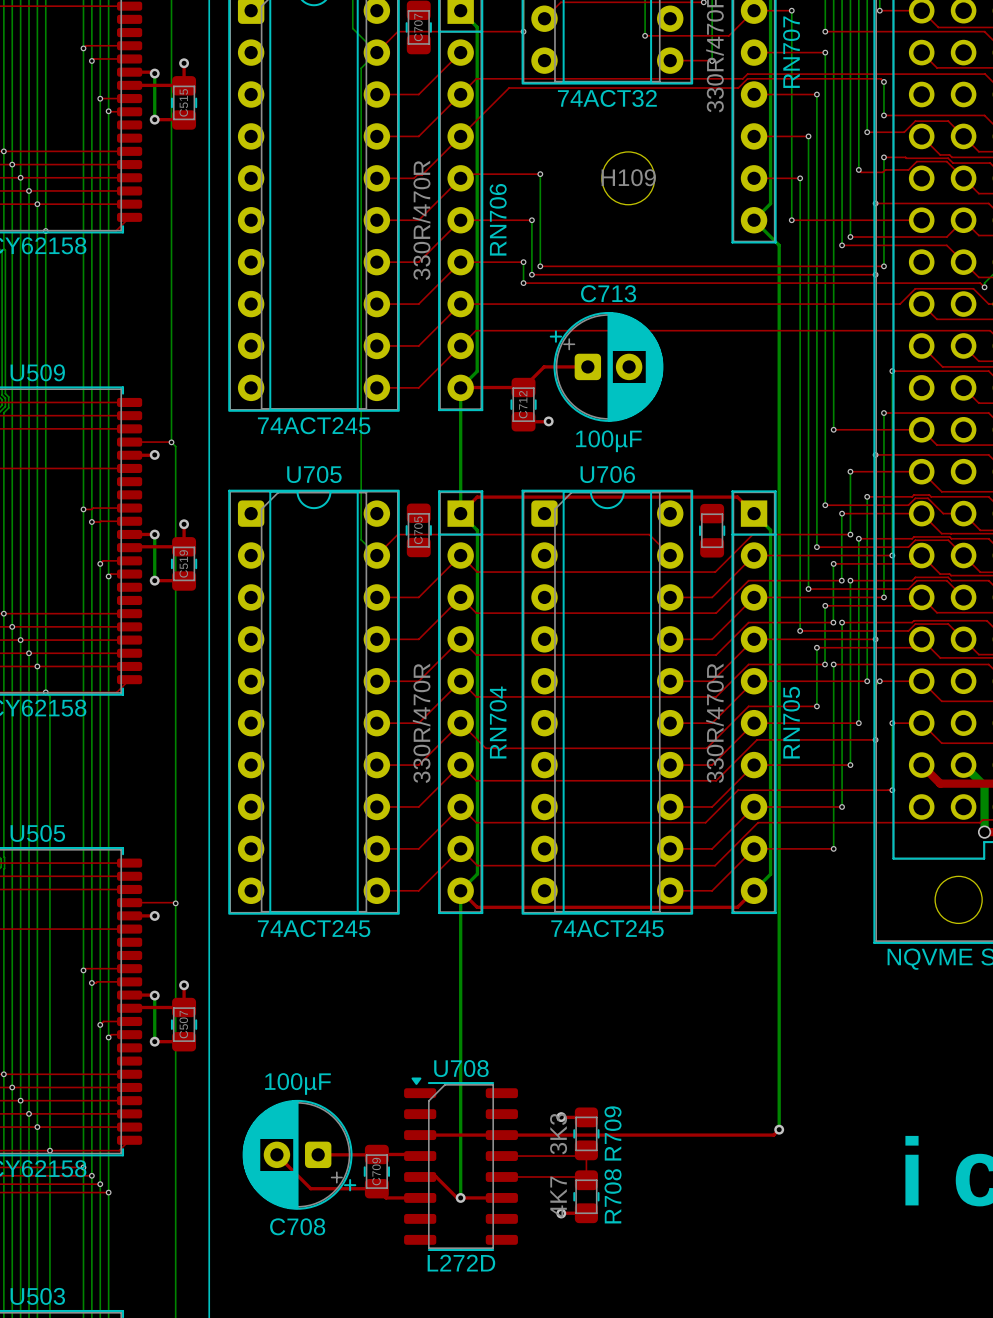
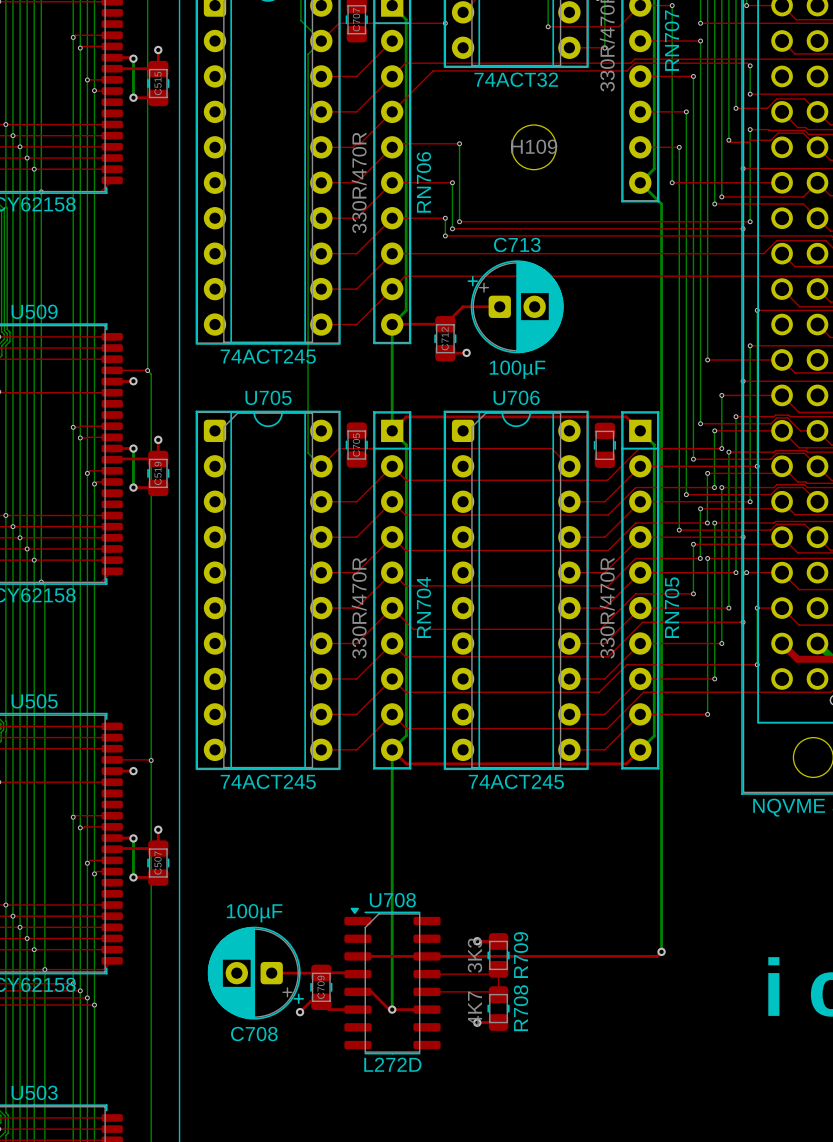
top track: (276, 1154) (310, 1188) (363, 1188) -> (300, 1012) (310, 1001)
via: none -> (300, 1012)

